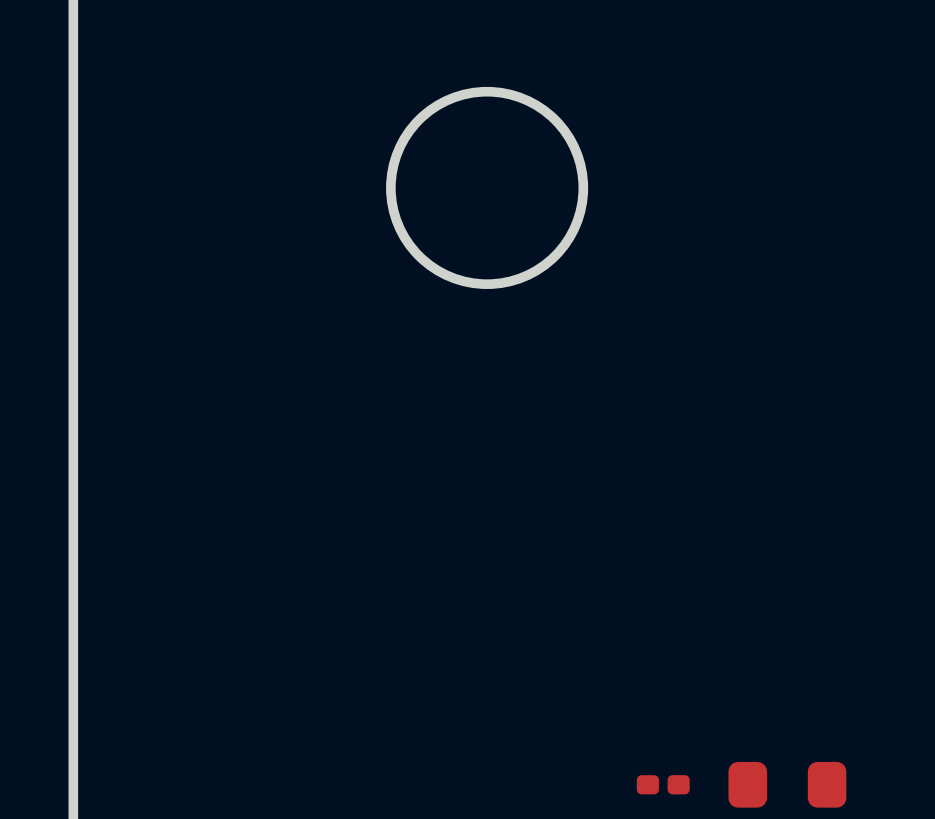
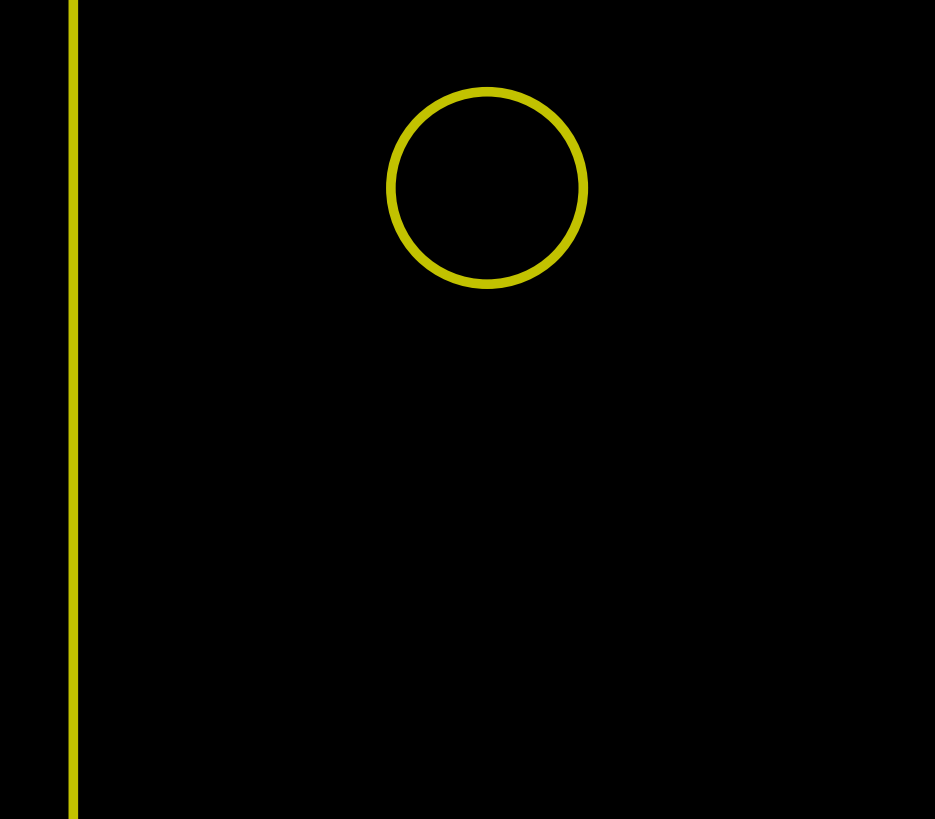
part: (663, 784) -> none
part: (787, 784) -> none

